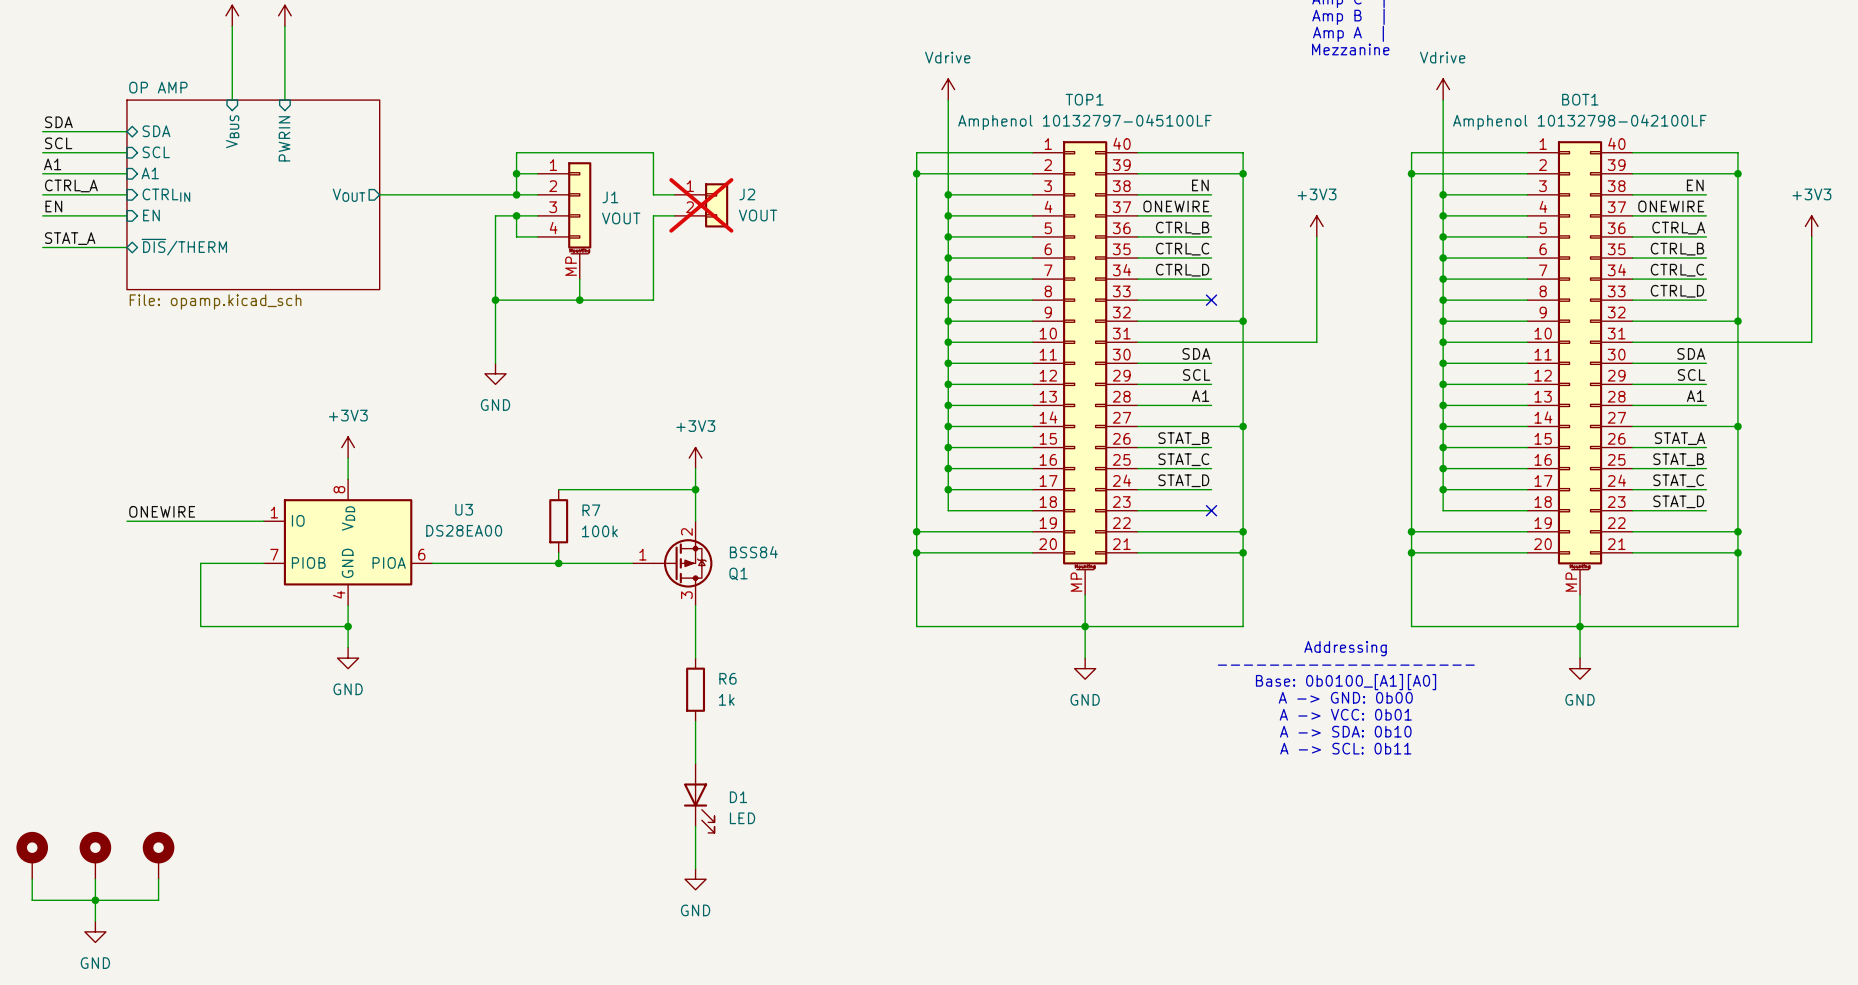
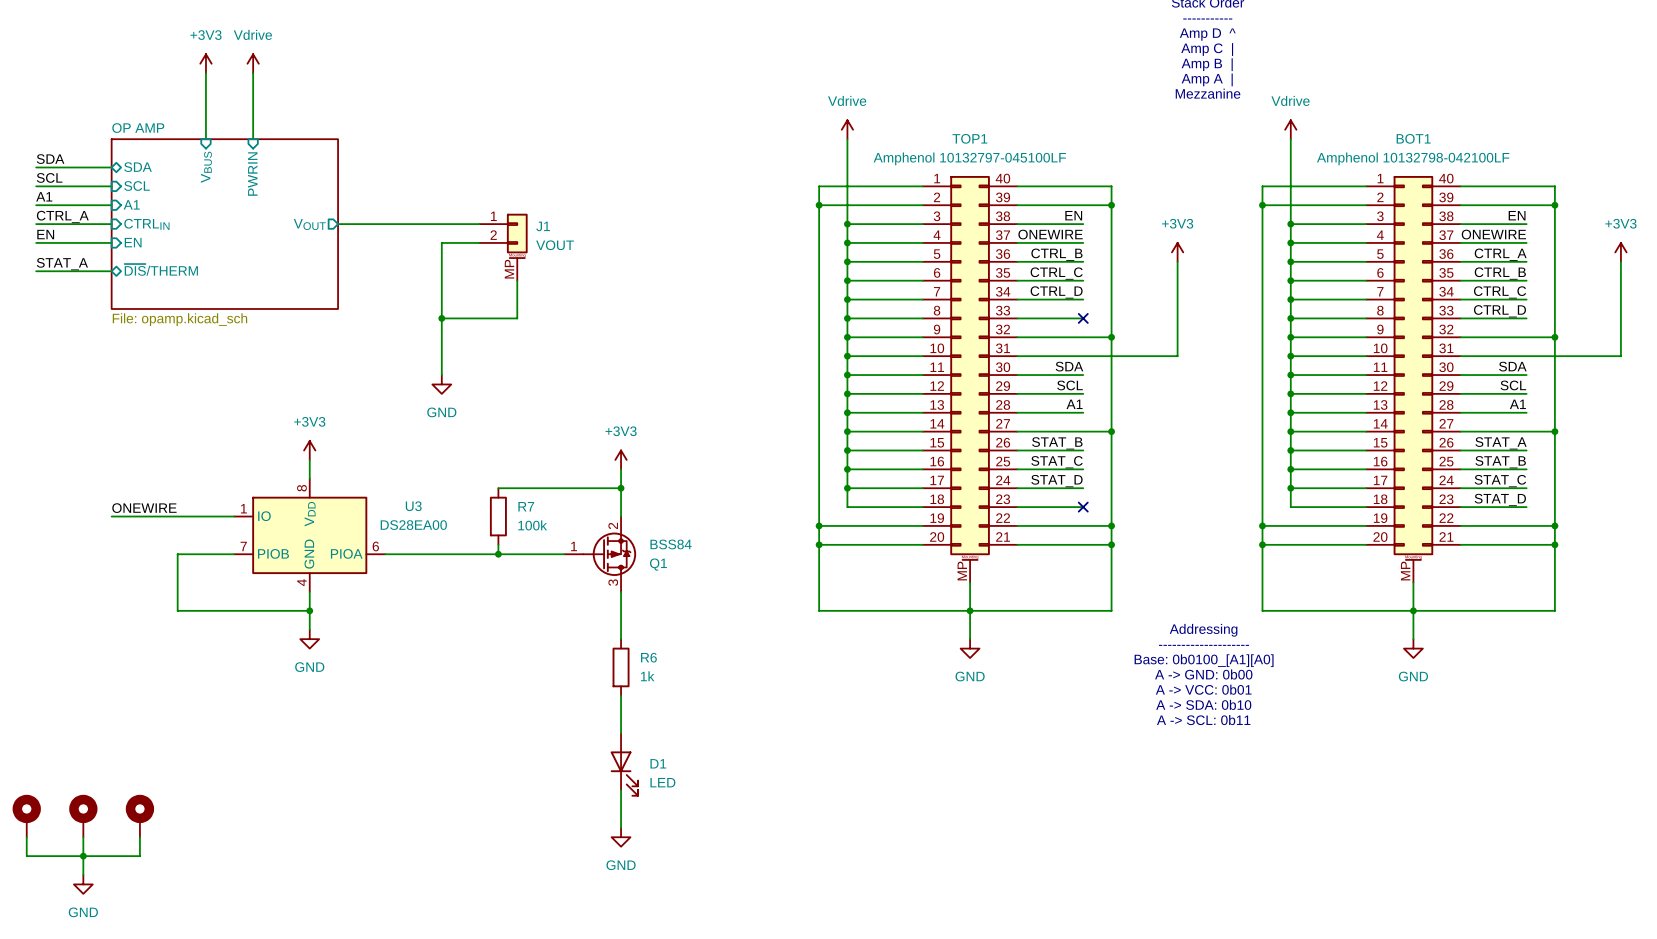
J1 symbol: [537, 162, 592, 280] -> [479, 213, 528, 281]
wire: (516, 173) (537, 173) -> none
junction: (516, 173) -> none
wire: (516, 194) (516, 152) (653, 152) (653, 194) (674, 194) -> none
junction: (516, 194) -> none
J2: VOUT (701, 205) -> none
wire: (516, 215) (516, 236) (537, 236) -> none
junction: (516, 215) -> none
wire: (674, 215) (653, 215) (653, 300) (579, 300) -> none
junction: (579, 300) -> none

